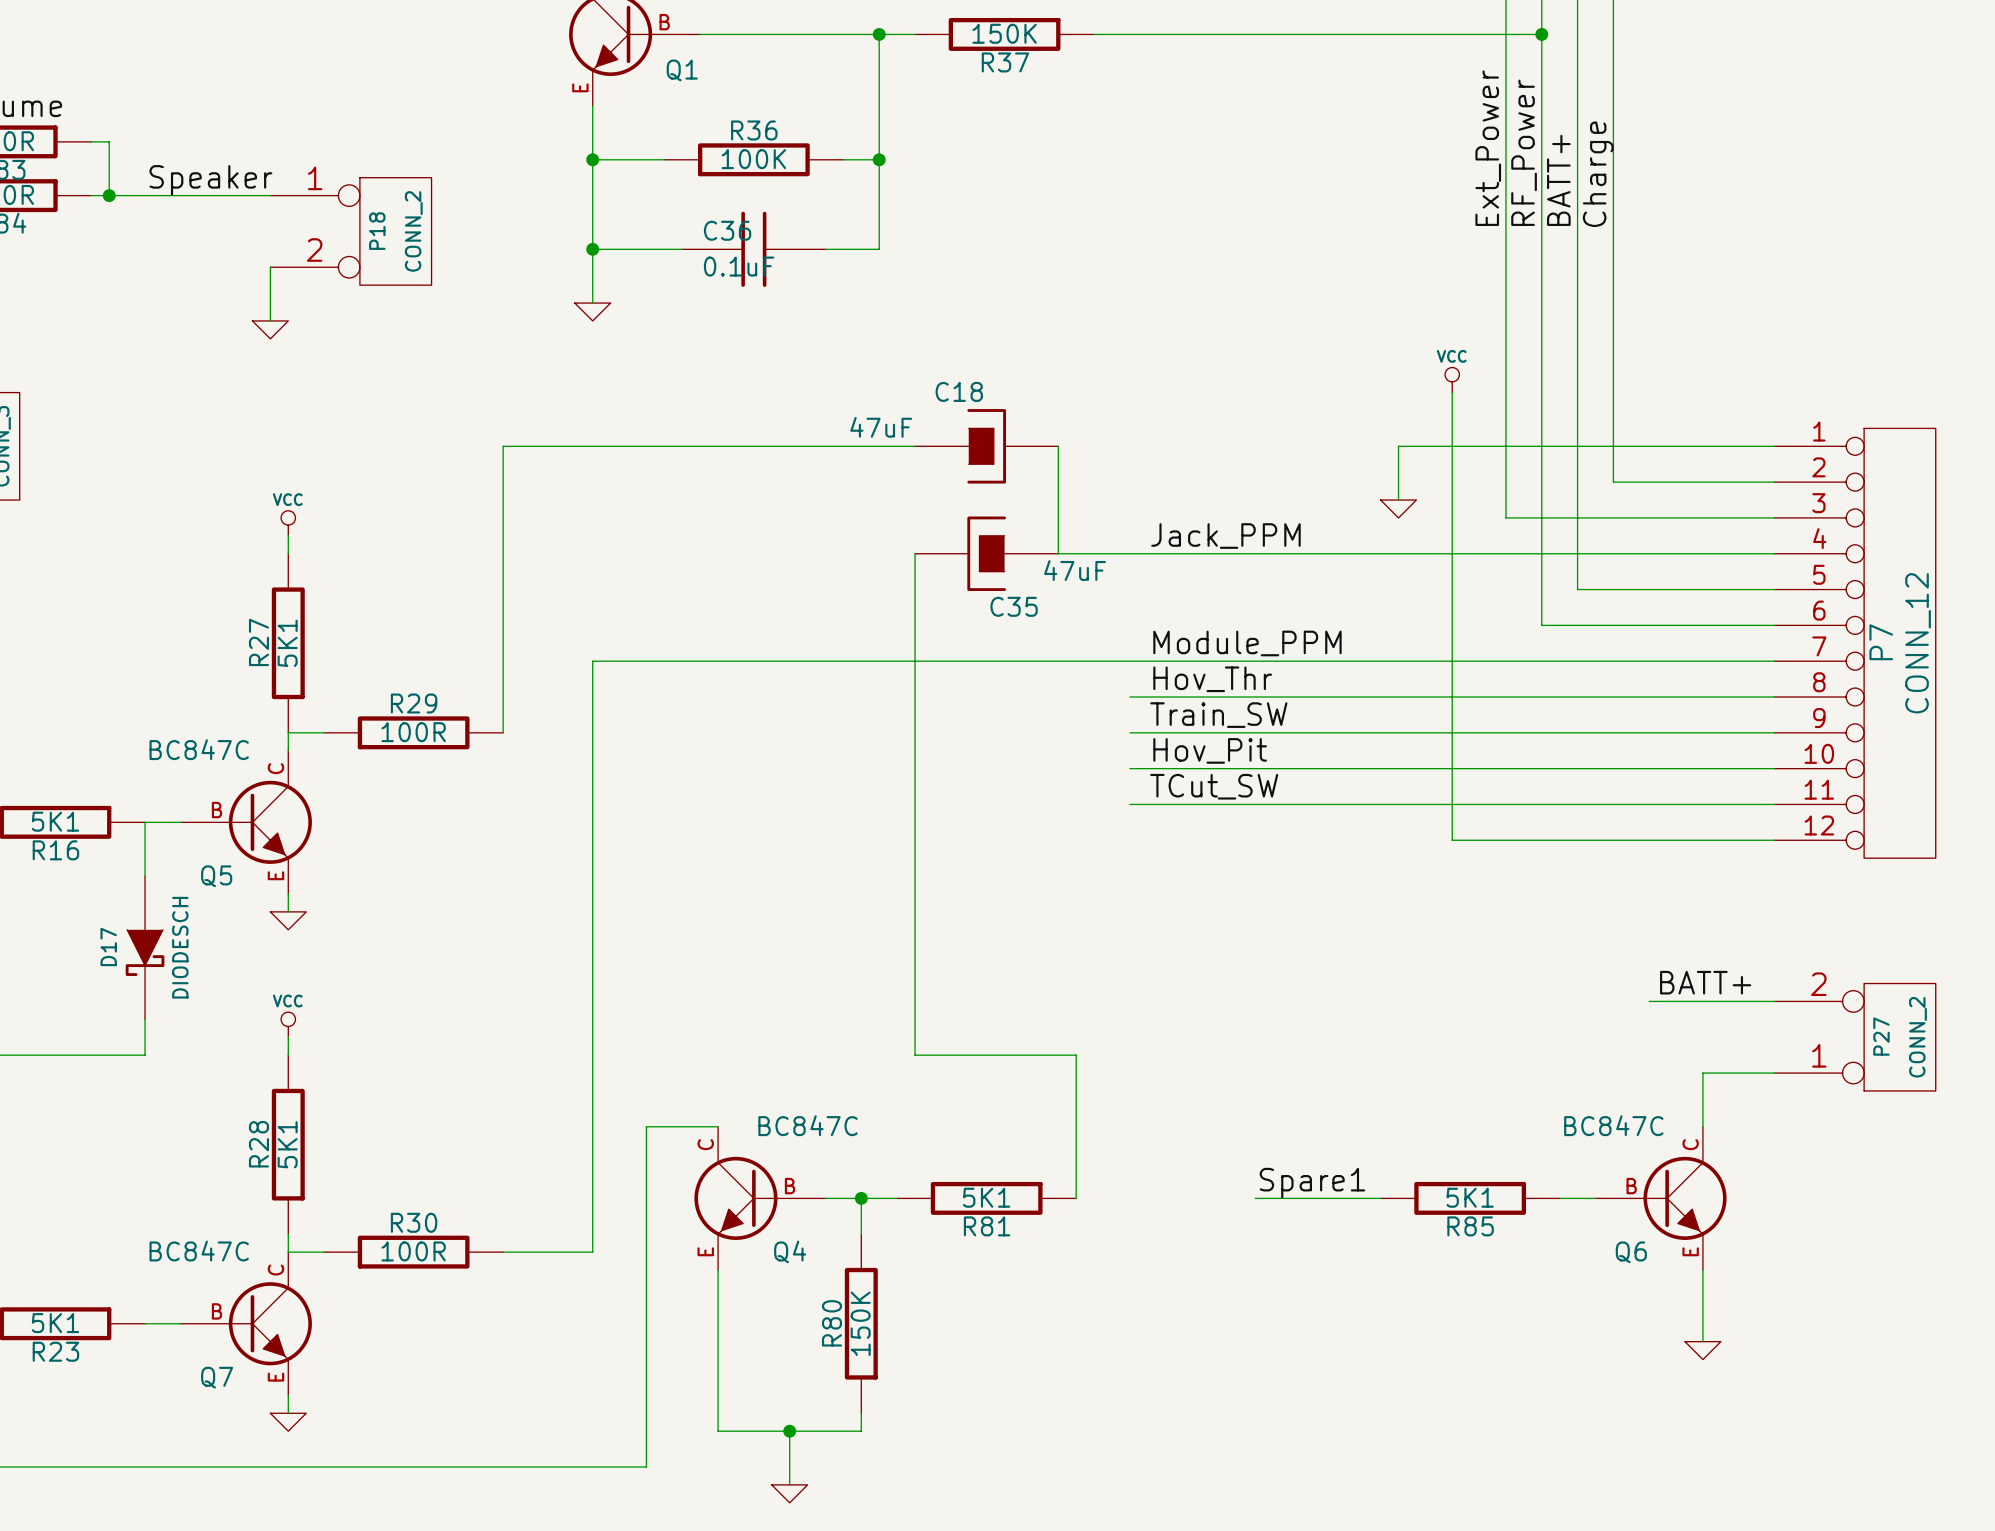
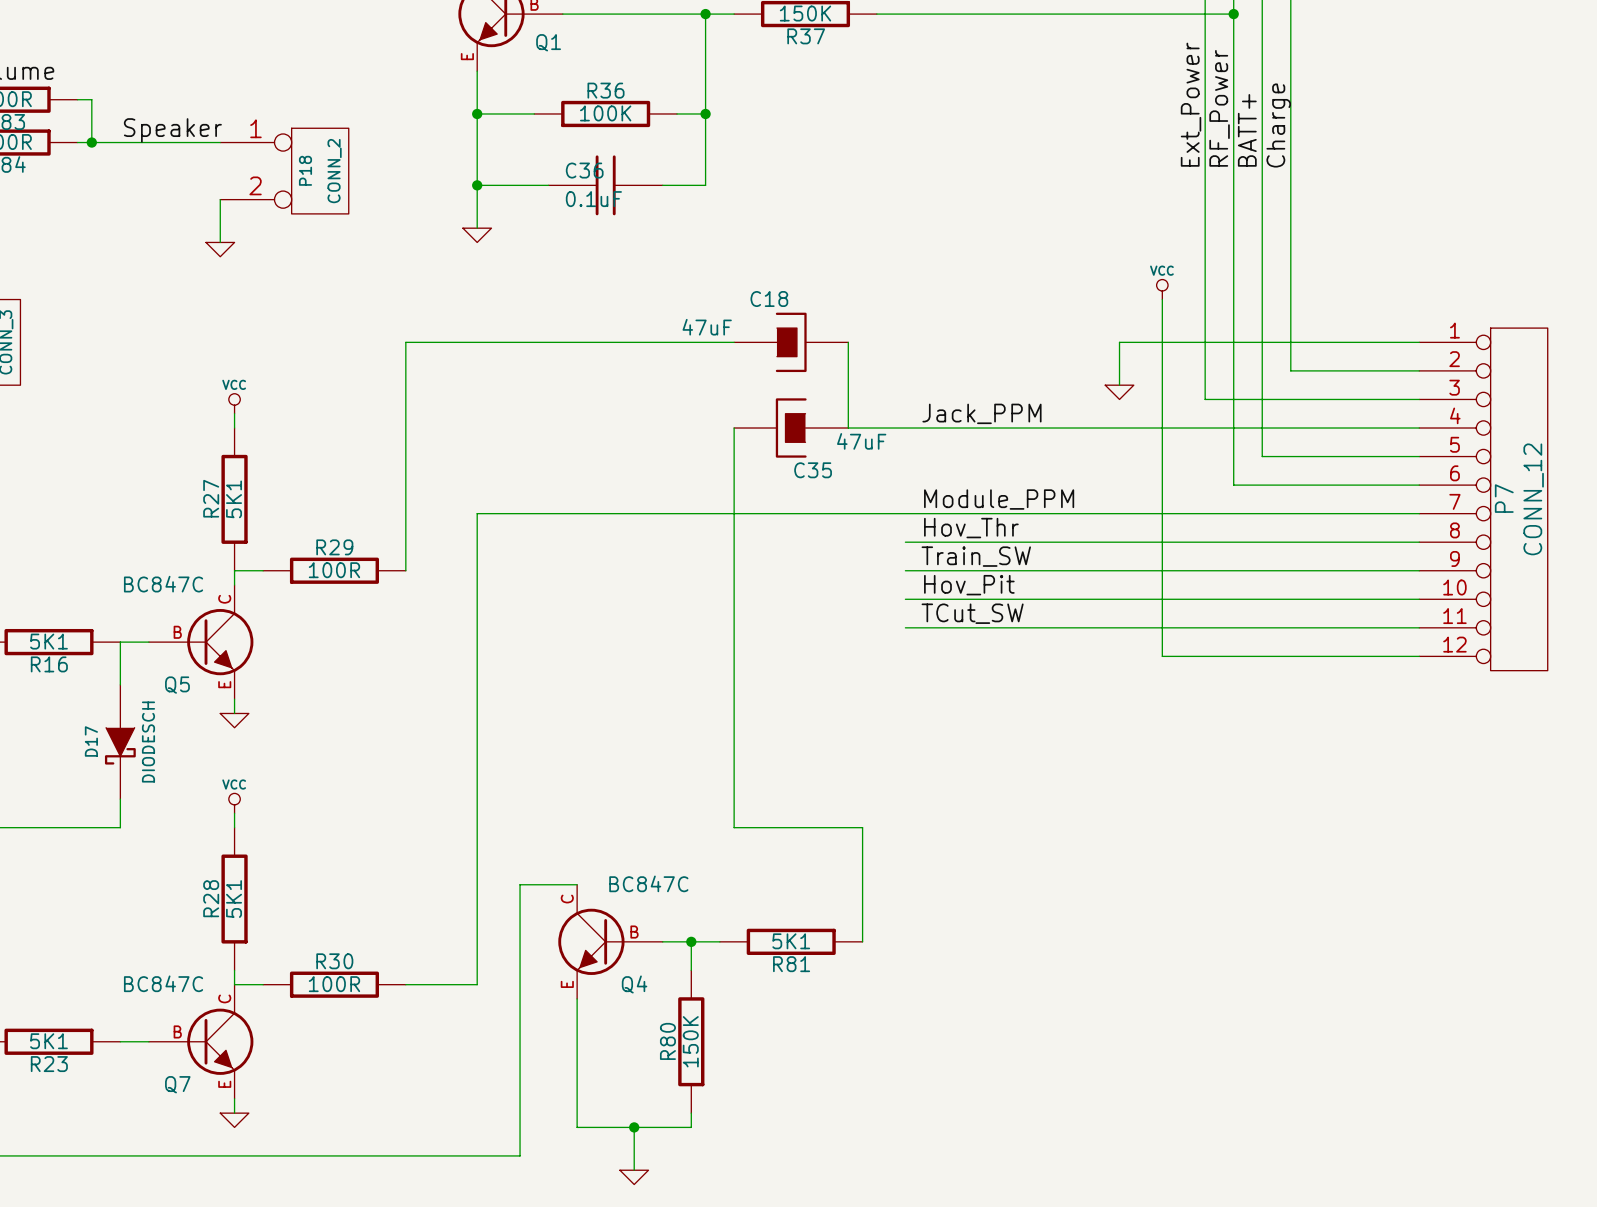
label: BATT+ (1705, 982) -> none
wire: (1649, 1001) (1774, 1001) -> none
P27: CONN_2 (1855, 1037) -> none
wire: (1774, 1073) (1702, 1073) (1702, 1126) -> none
label: Spare1 (1312, 1183) -> none
wire: (1255, 1198) (1380, 1198) -> none
R85: 5K1 (1470, 1198) -> none
wire: (1559, 1198) (1595, 1198) -> none
Q6: BC847C (1661, 1198) -> none
wire: (1702, 1270) (1702, 1341) -> none
power symbol: (1702, 1350) -> none

